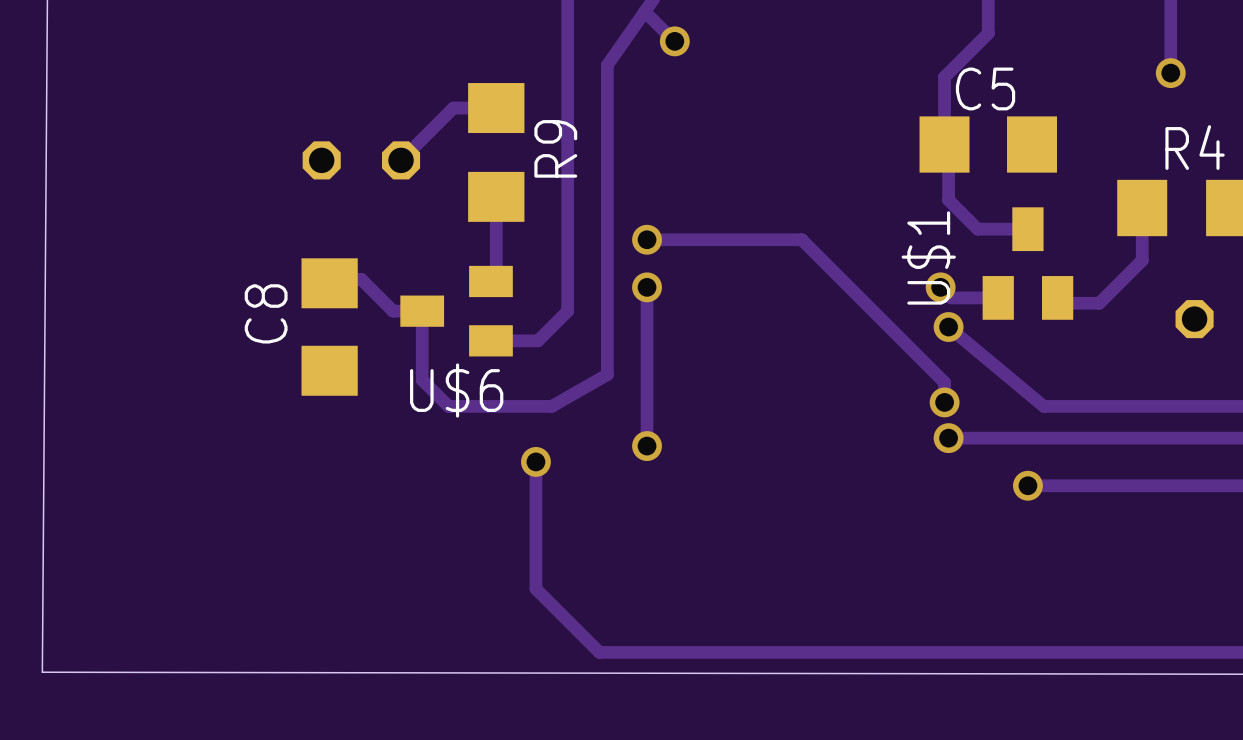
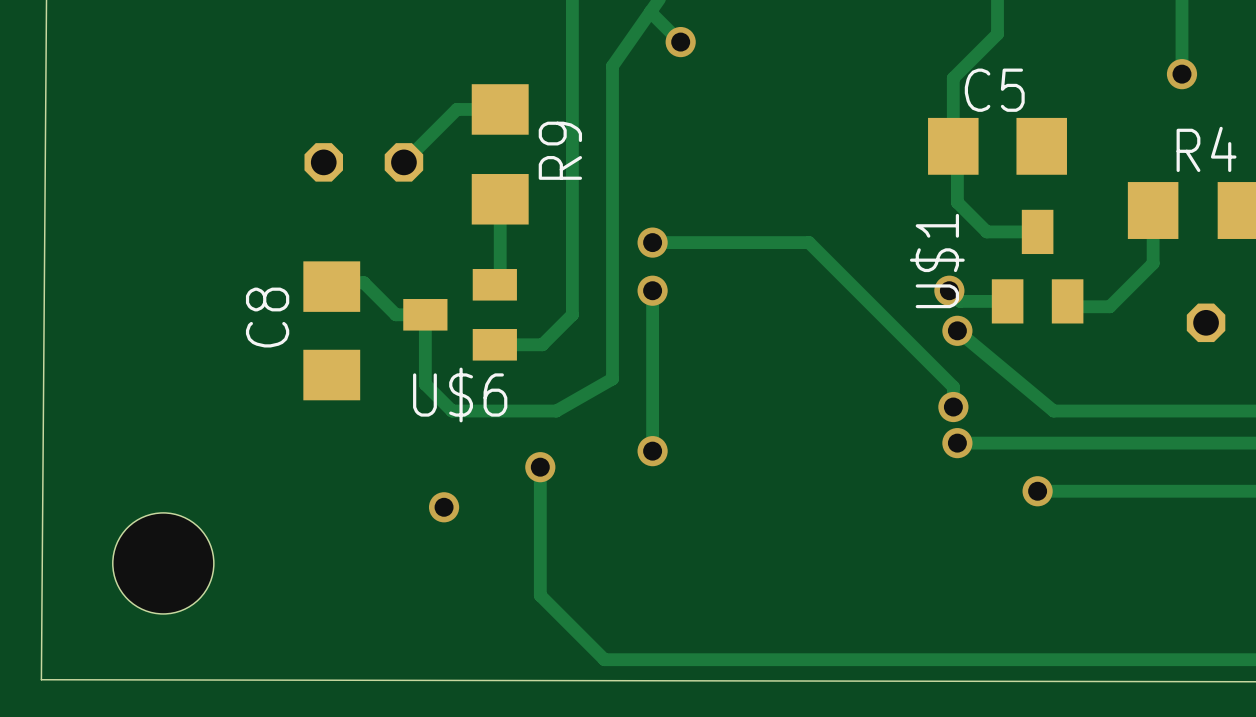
via: none -> (444, 507)
hole: none -> (163, 563)

